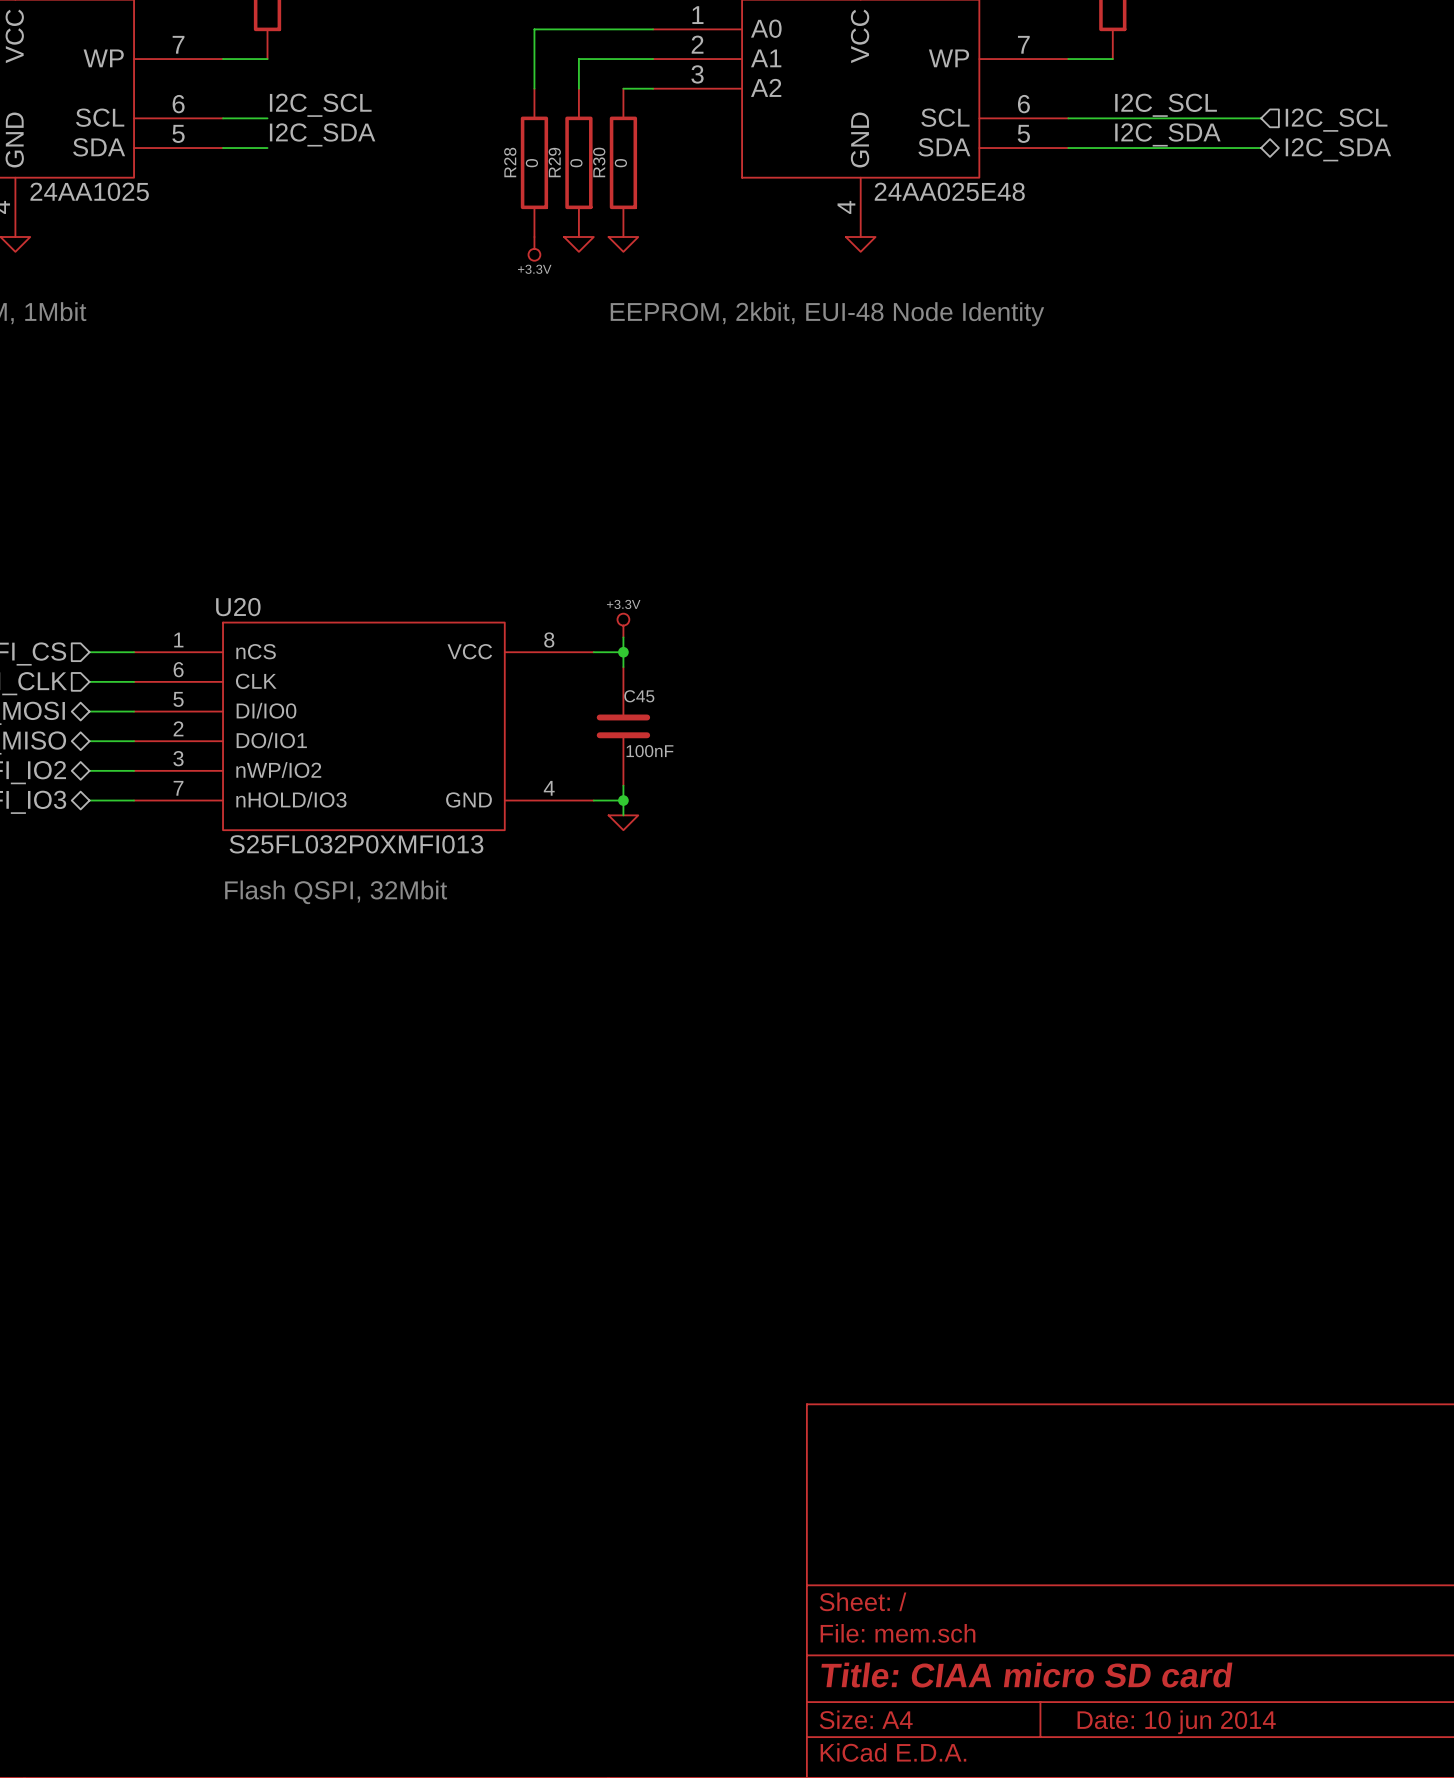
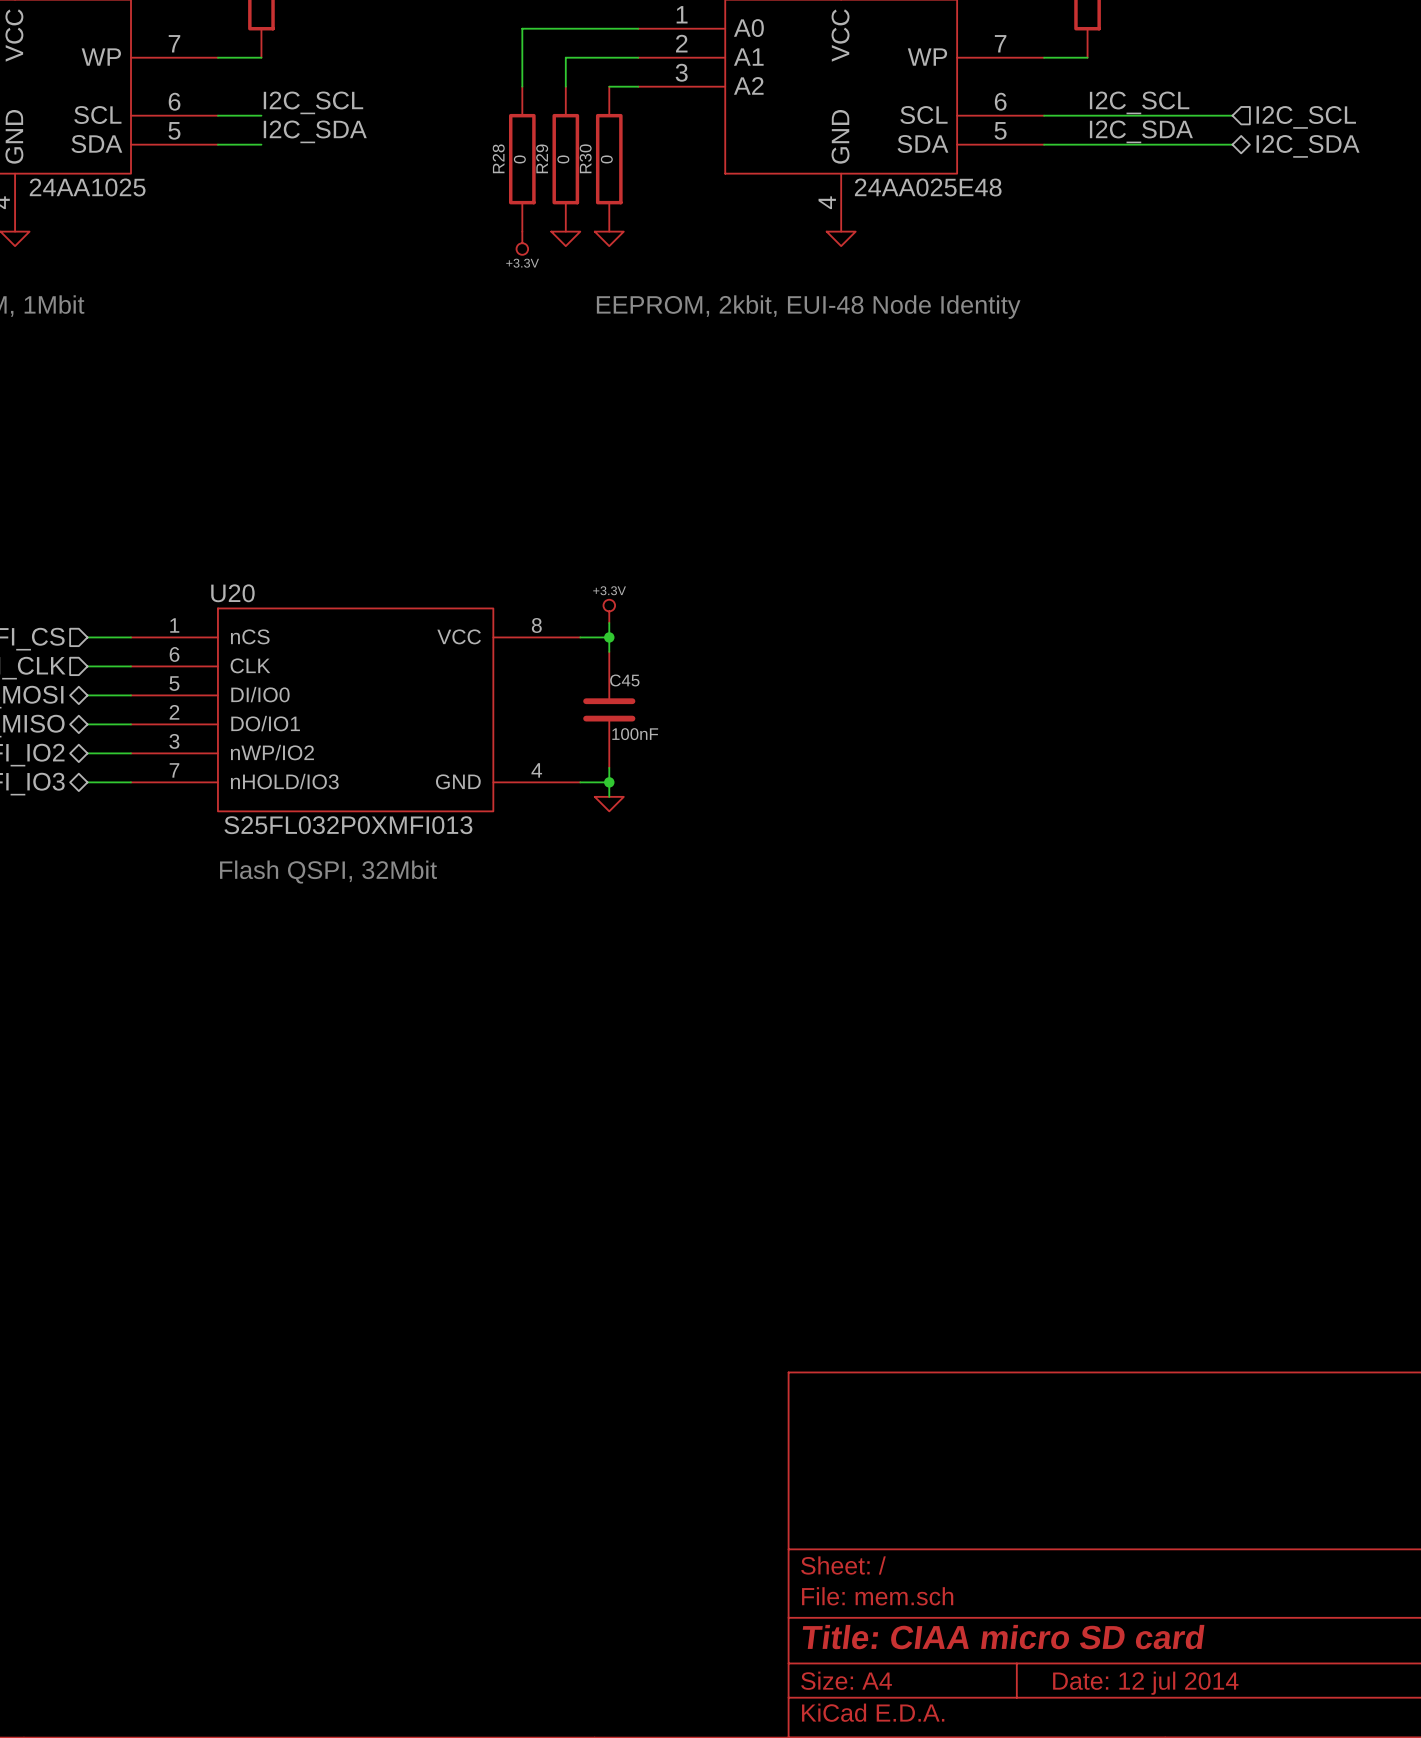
title block: Date: 10 jun 2014 (1176, 1722) -> Date: 12 jul 2014 (1145, 1683)

